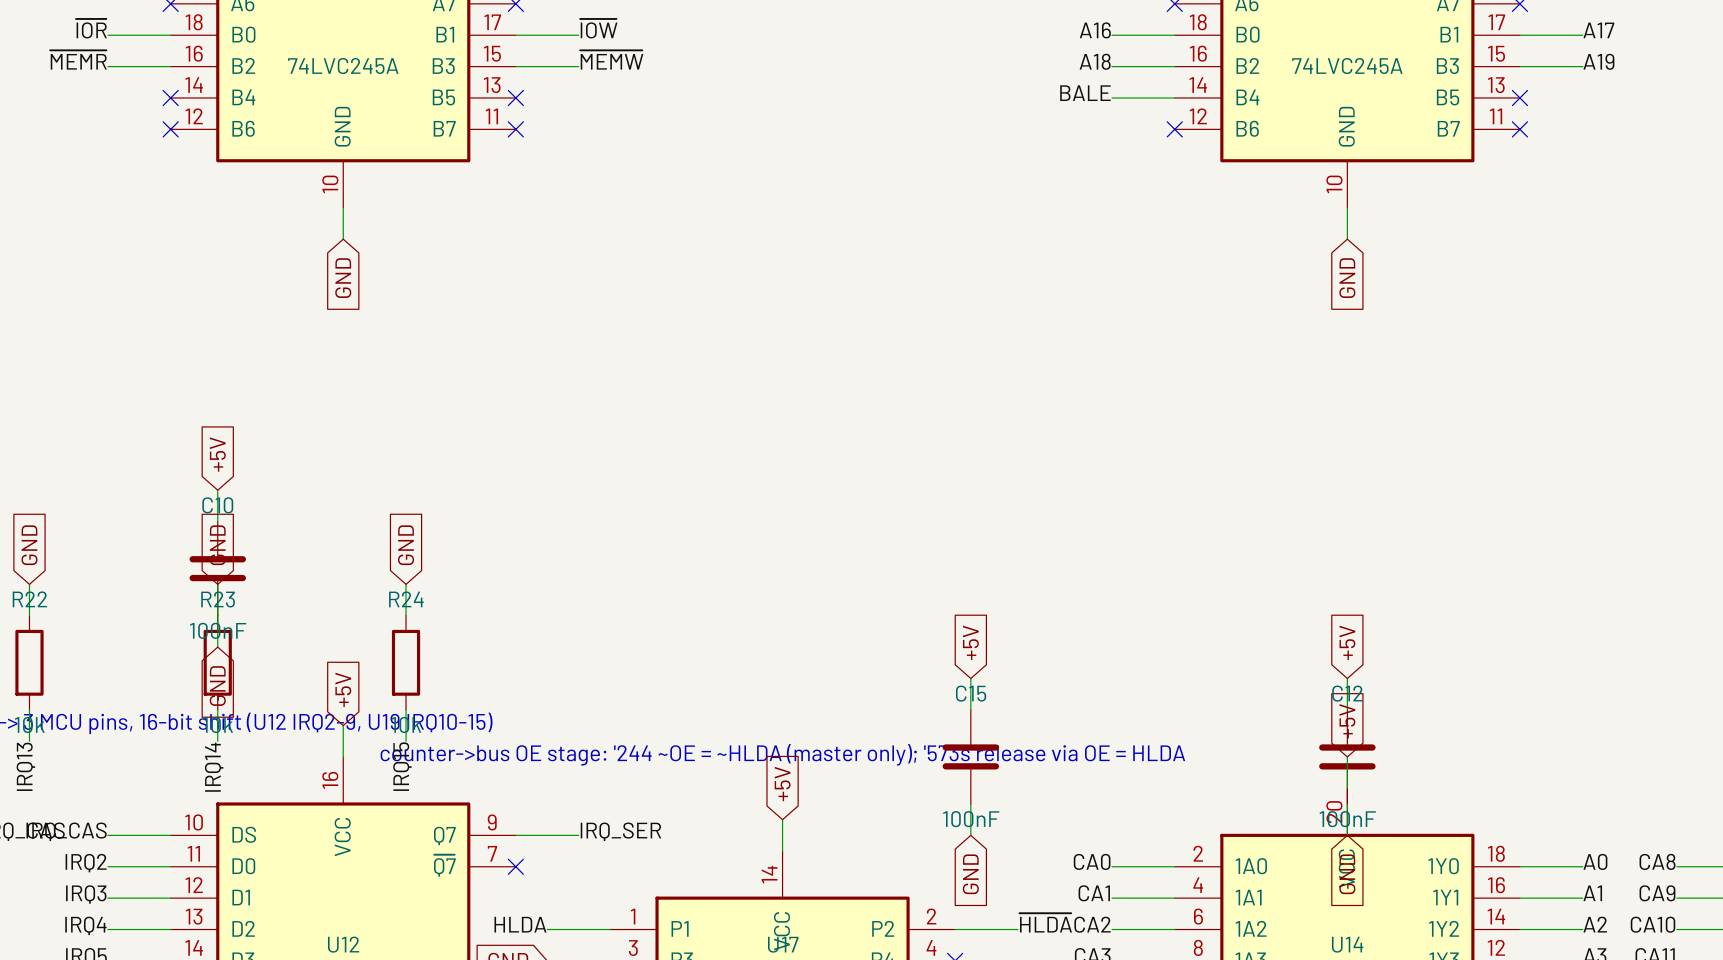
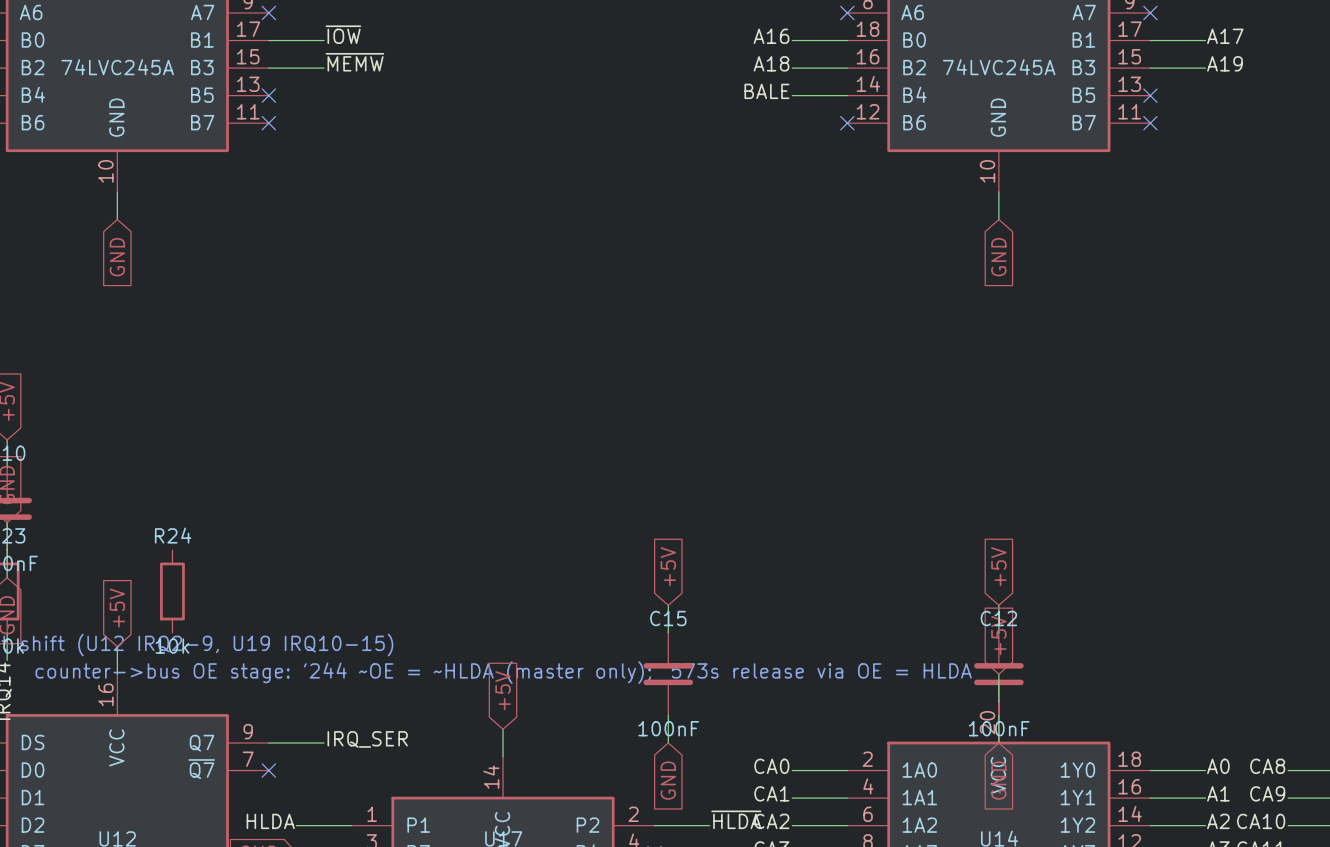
global label: GND (406, 545) -> none
wire: (406, 584) (406, 615) -> none
wire: (406, 709) (406, 741) -> none
label: IRQ15 (402, 766) -> none

